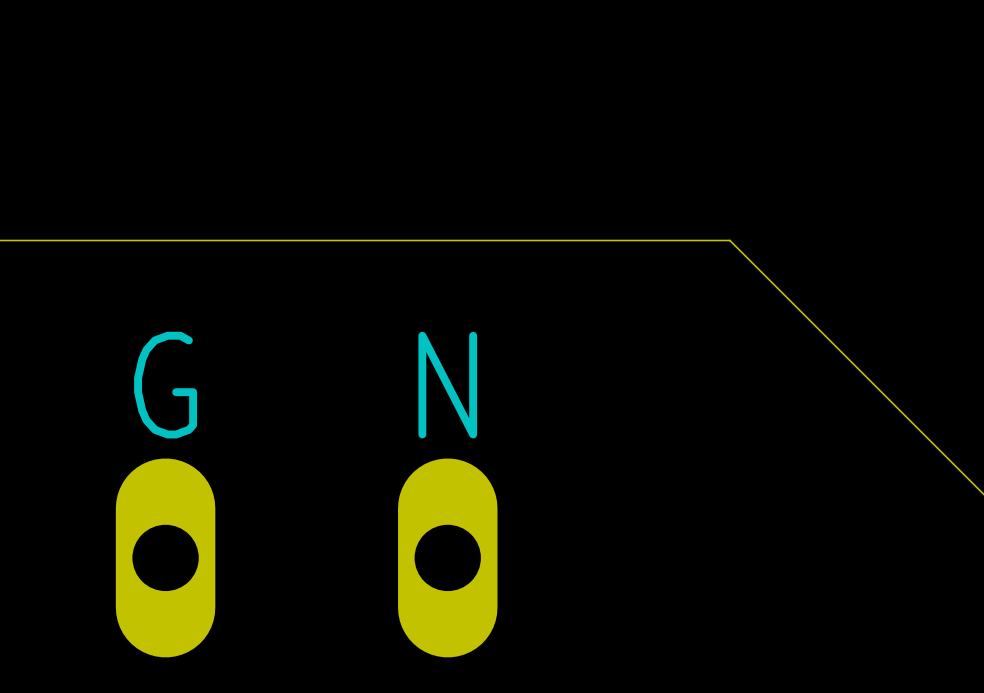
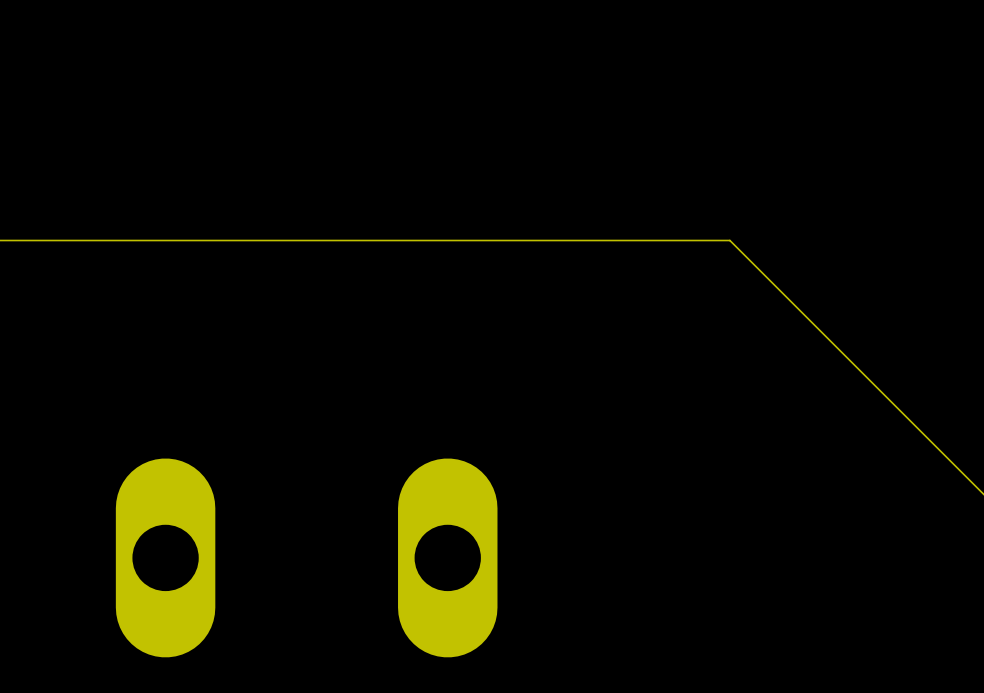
text: G (165, 385) -> none
text: N (447, 385) -> none

